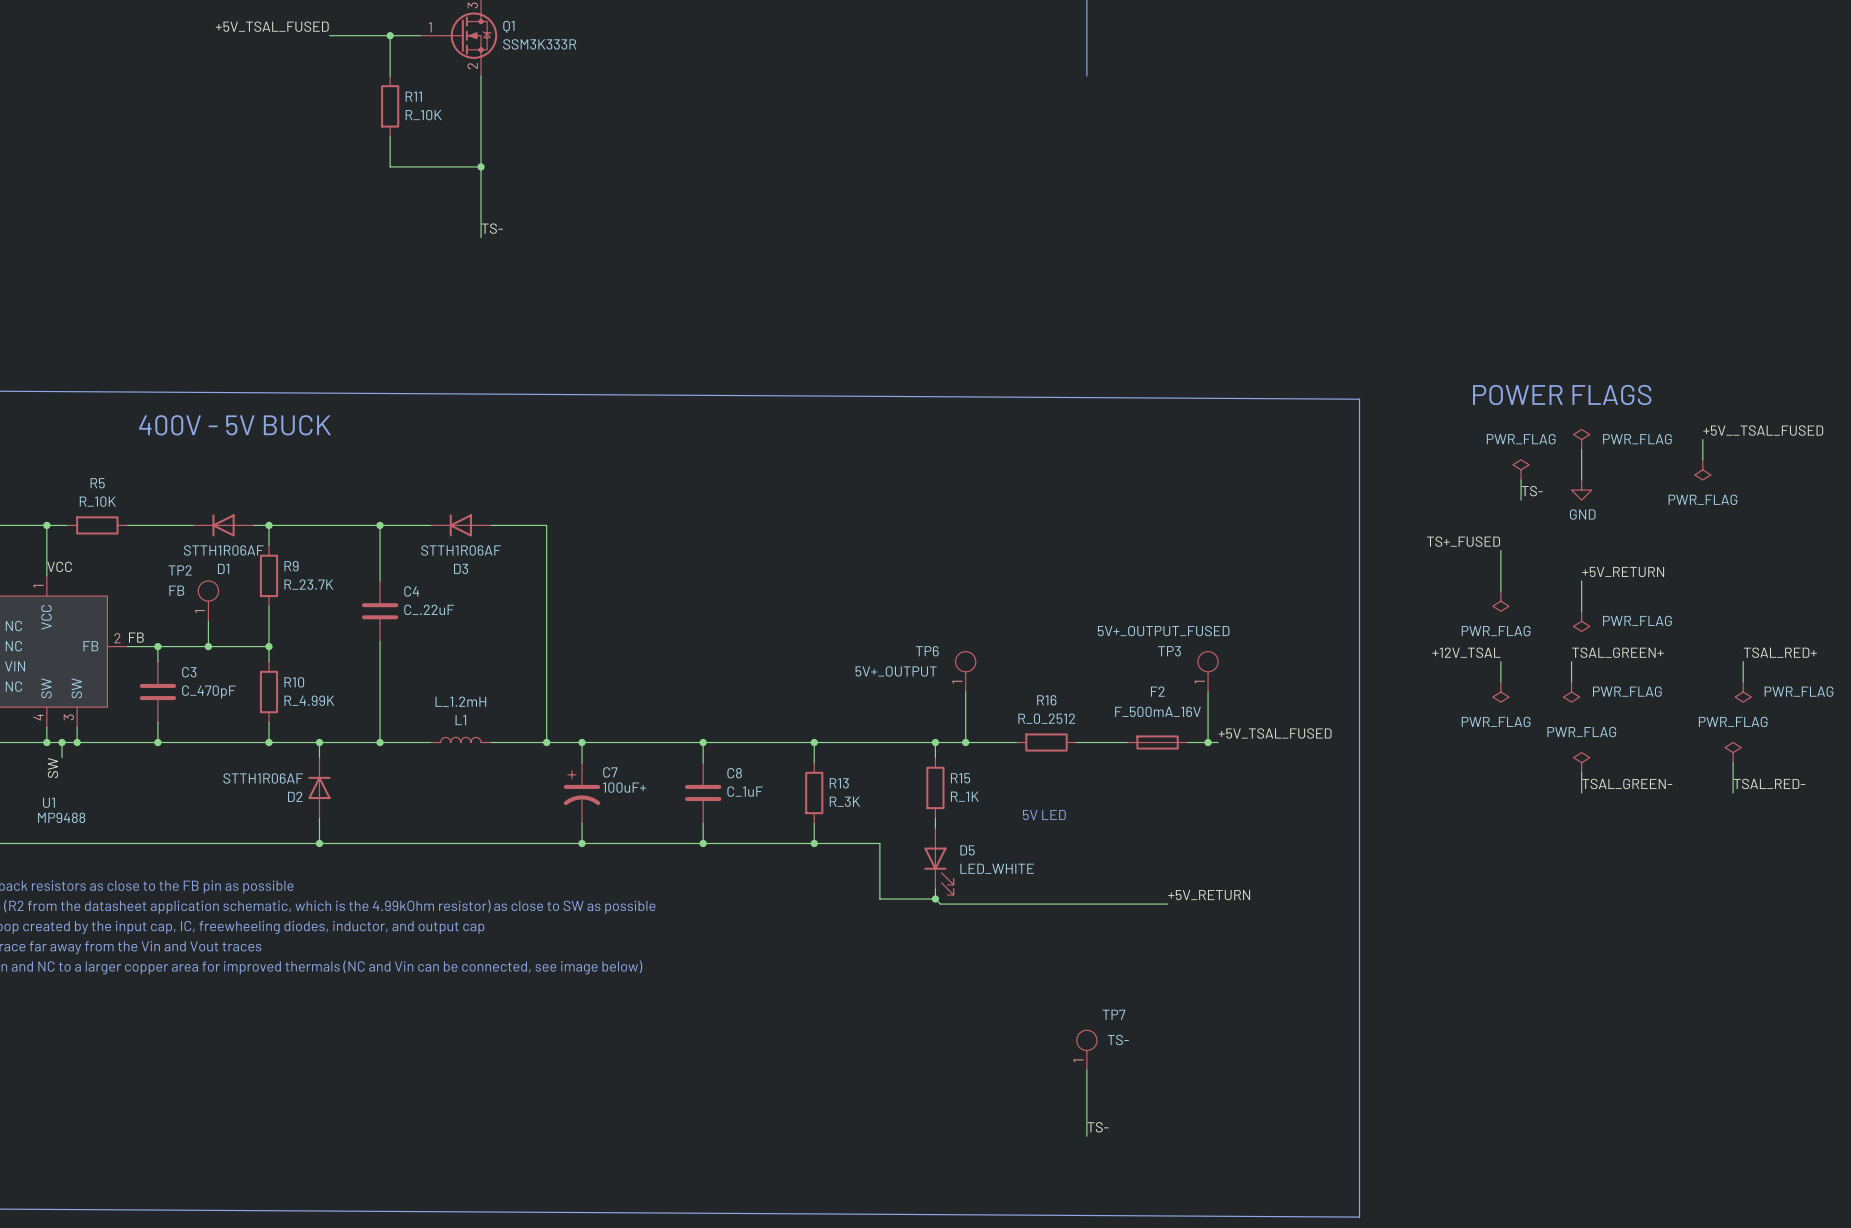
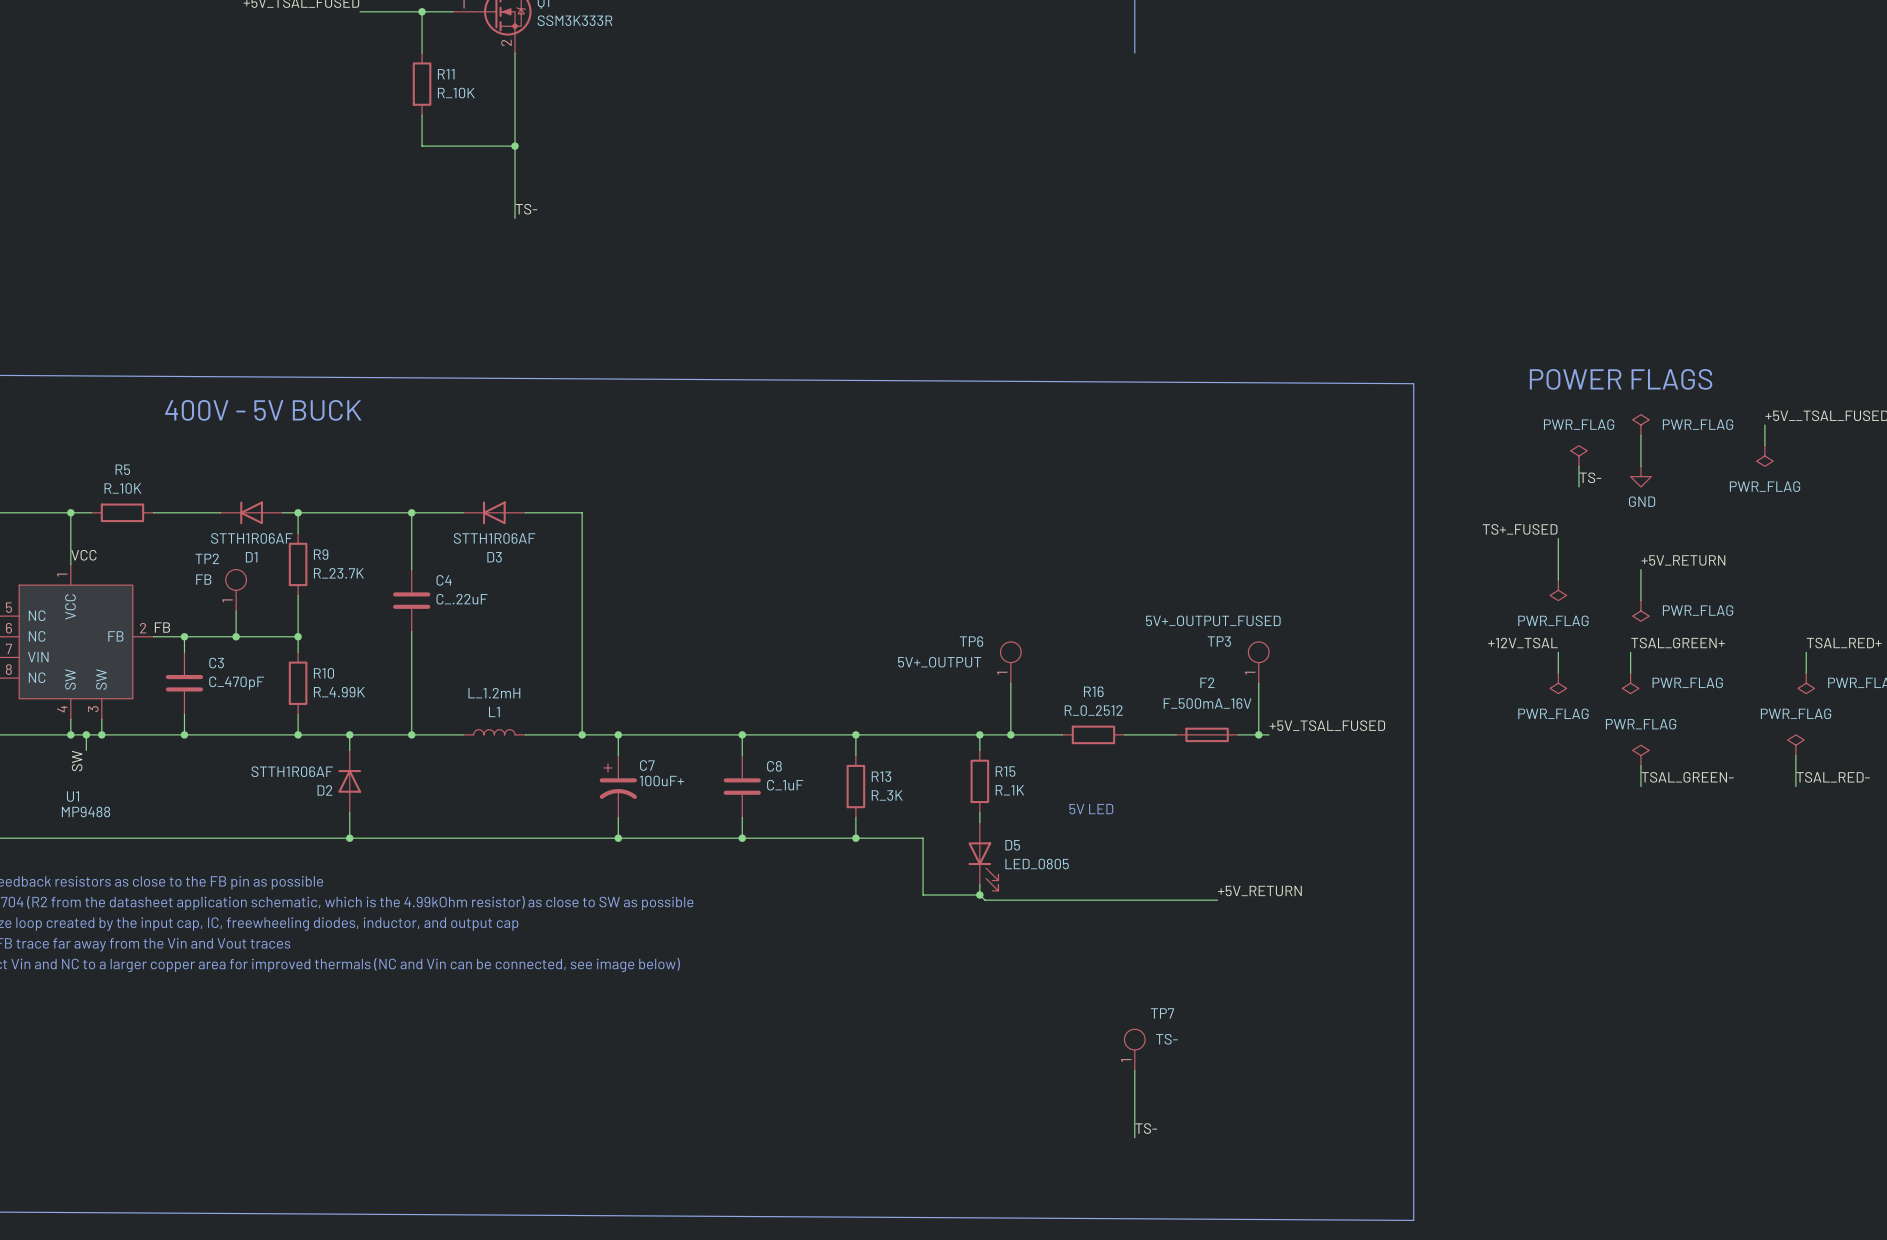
D5 value: LED_WHITE (997, 868) -> LED_0805 (1037, 864)

